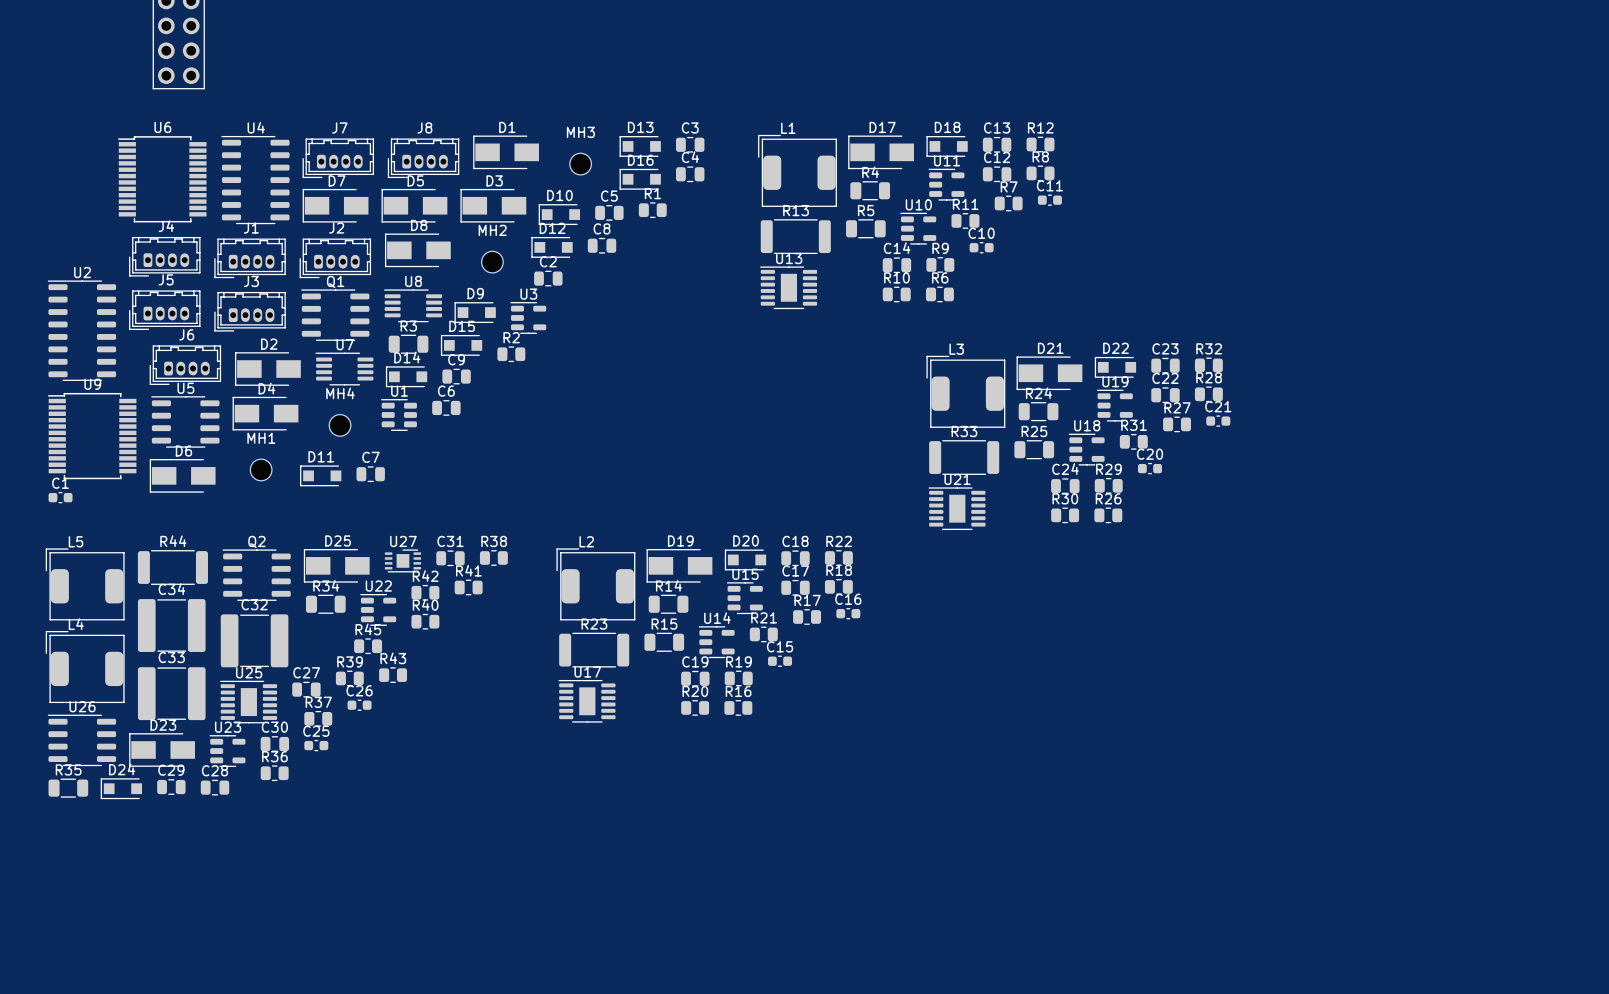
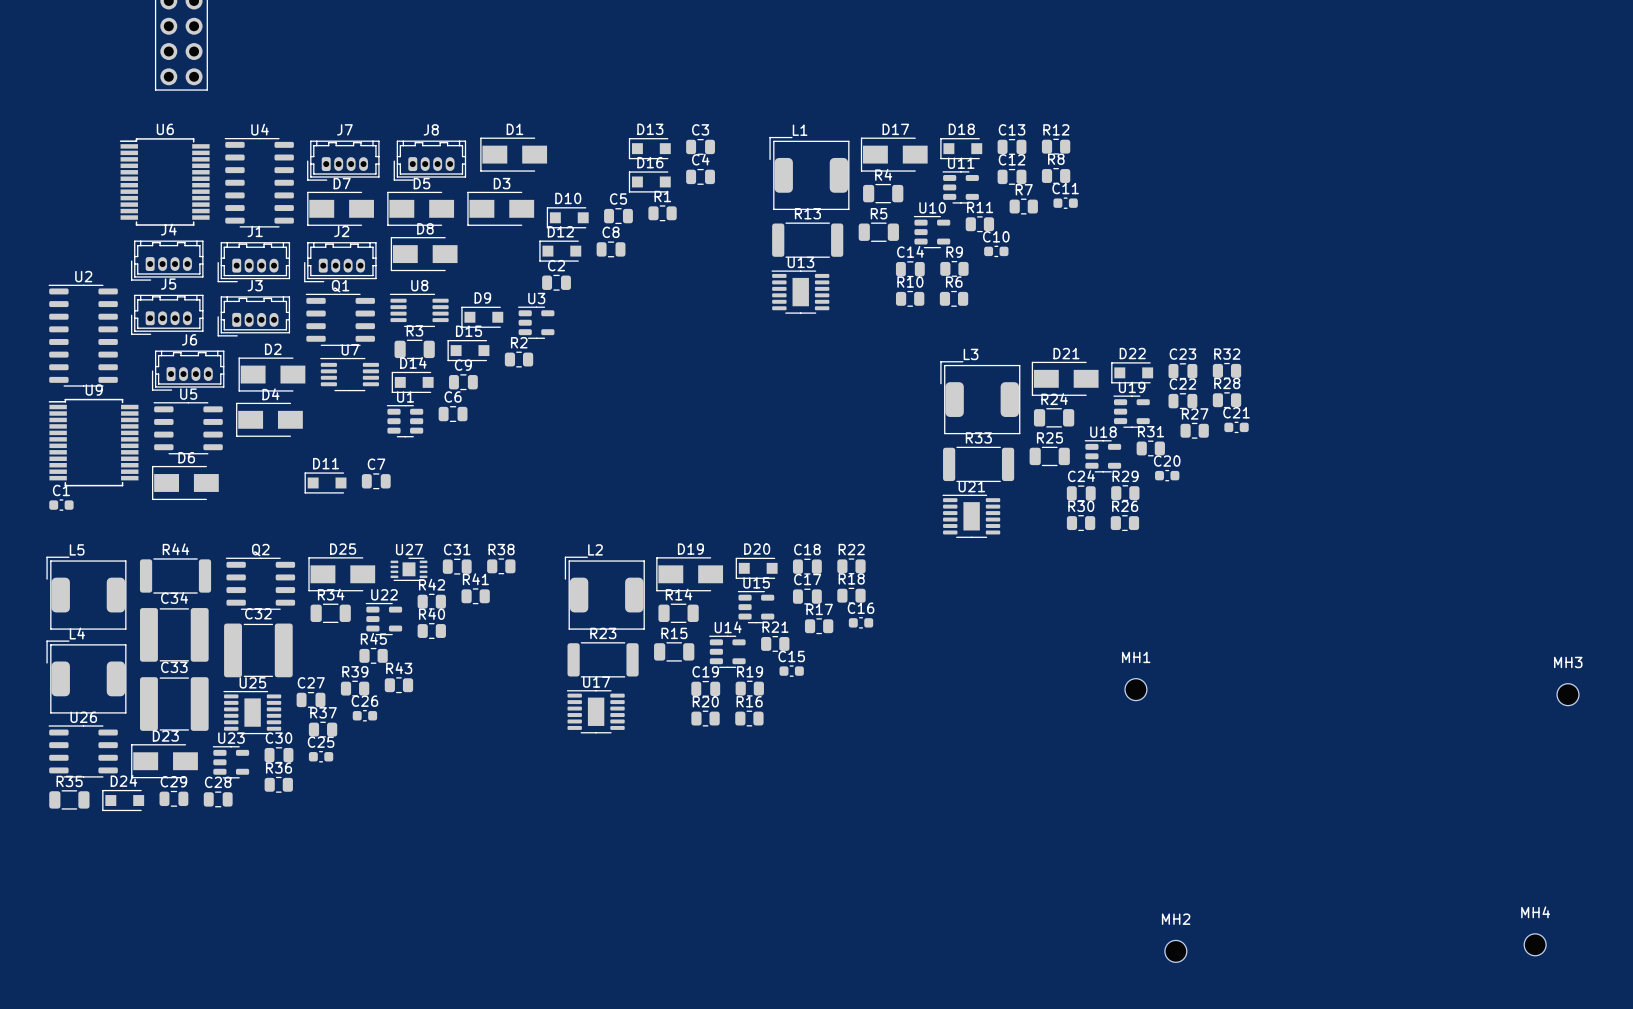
MH3 position: (580, 164) -> (1568, 694)
MH2 position: (492, 262) -> (1175, 951)
MH4 position: (340, 425) -> (1535, 944)
MH1 position: (261, 469) -> (1135, 689)

